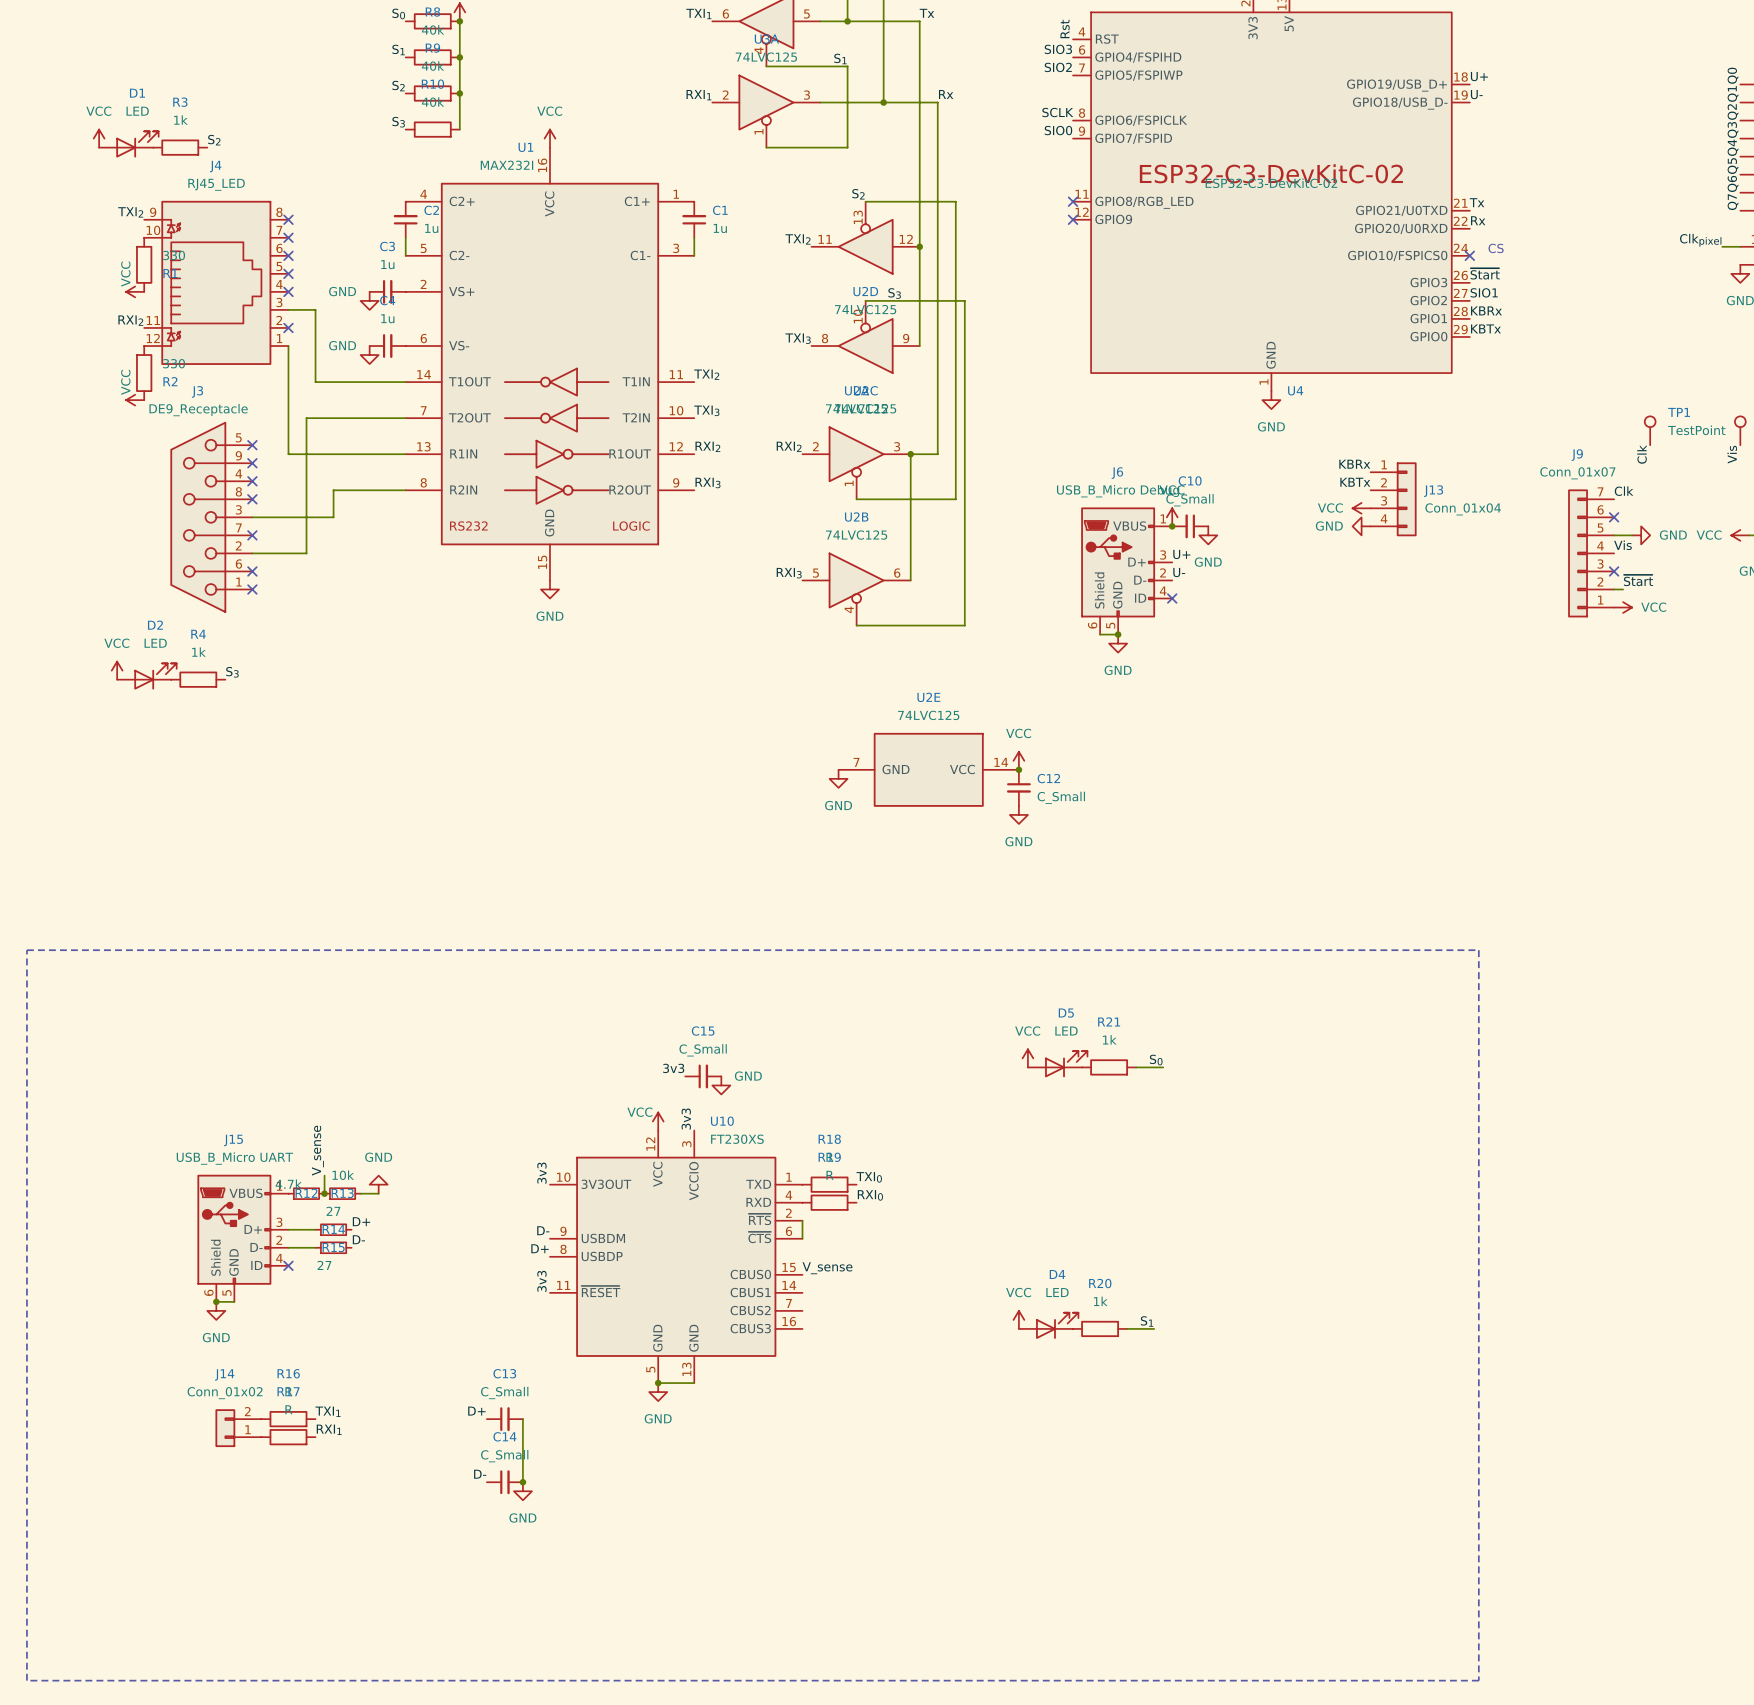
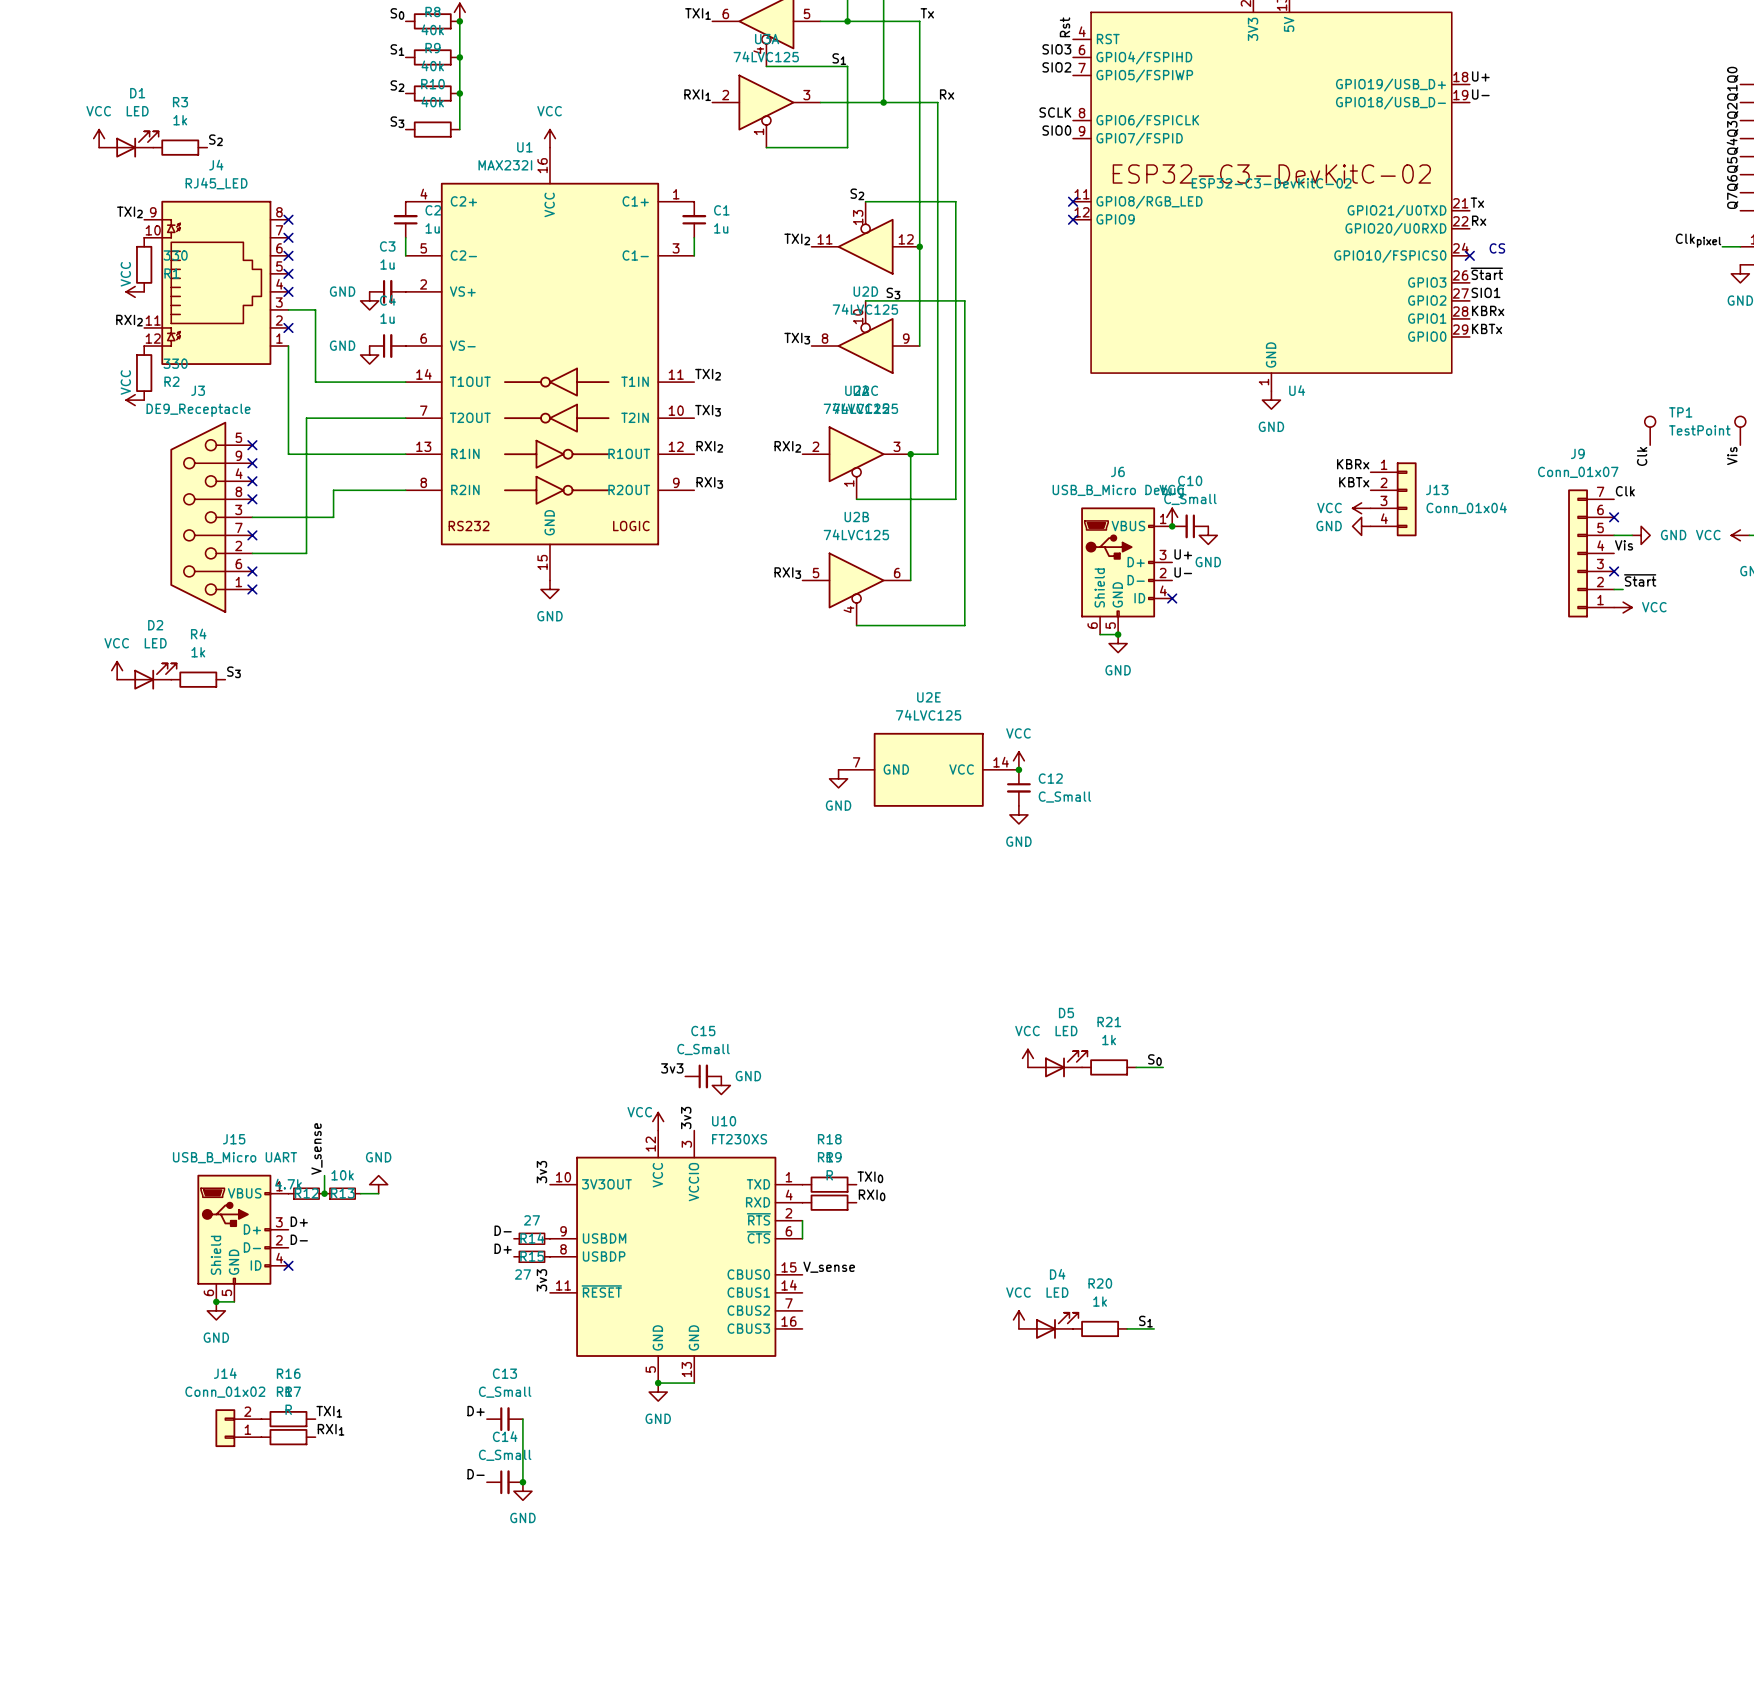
line: (26, 950) (1478, 950) (1478, 1680) (26, 1680) (26, 950) -> none
label position: D+ (361, 1221) -> D+ (299, 1221)
wire: (288, 1229) (315, 1229) -> none
R14 position: (333, 1229) -> (531, 1238)
label position: D- (543, 1230) -> D- (503, 1230)
label position: D- (358, 1239) -> D- (299, 1239)
wire: (288, 1247) (315, 1247) -> none
R15 position: (333, 1247) -> (531, 1256)
label position: D+ (540, 1248) -> D+ (503, 1248)

